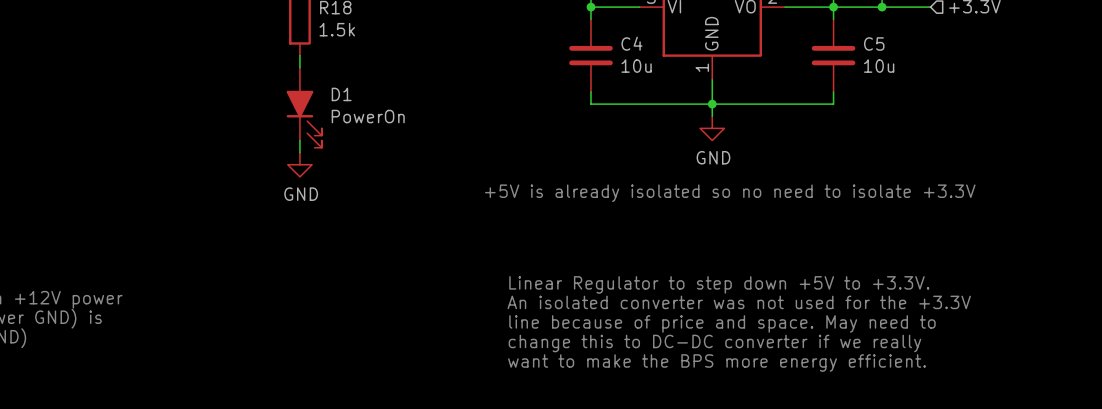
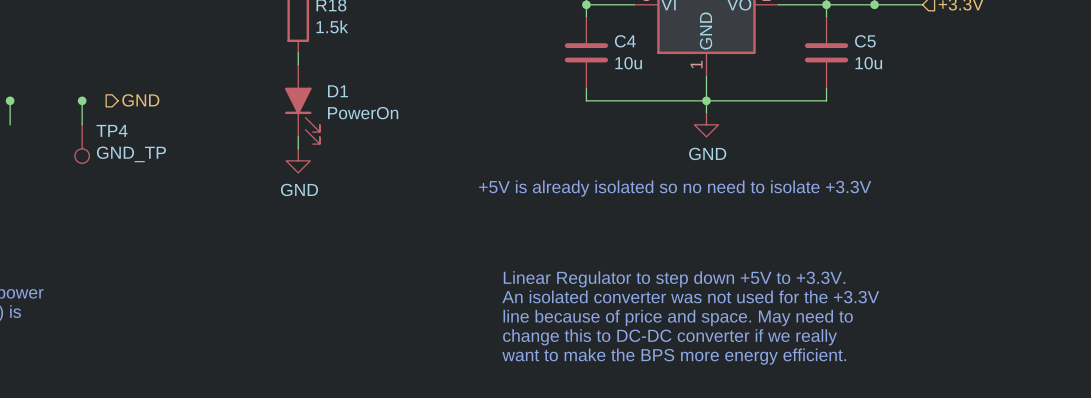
hierarchical label: none -> GND (140, 100)
wire: none -> (10, 100) (10, 124)
junction: none -> (10, 100)
wire: none -> (82, 100) (82, 124)
junction: none -> (82, 100)
TP4: none -> GND_TP (82, 144)

